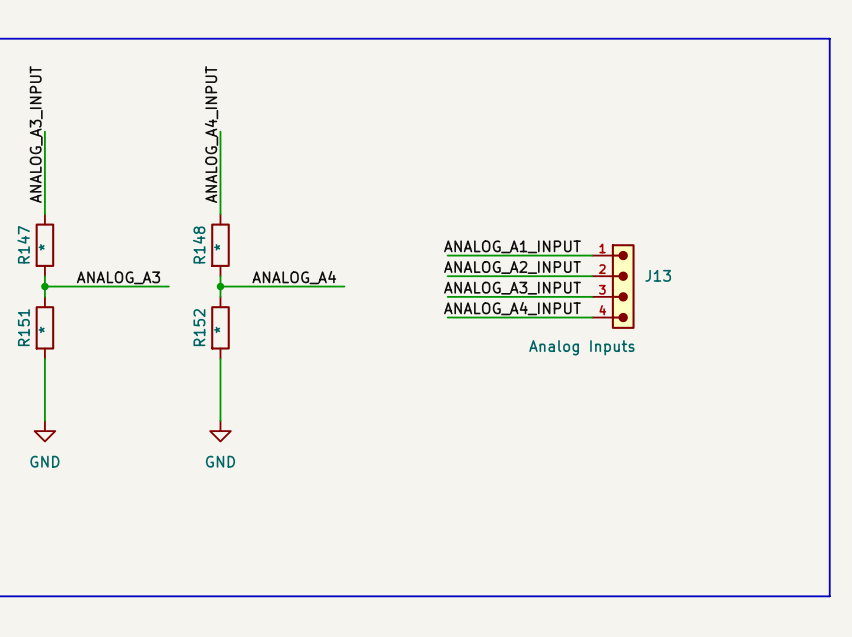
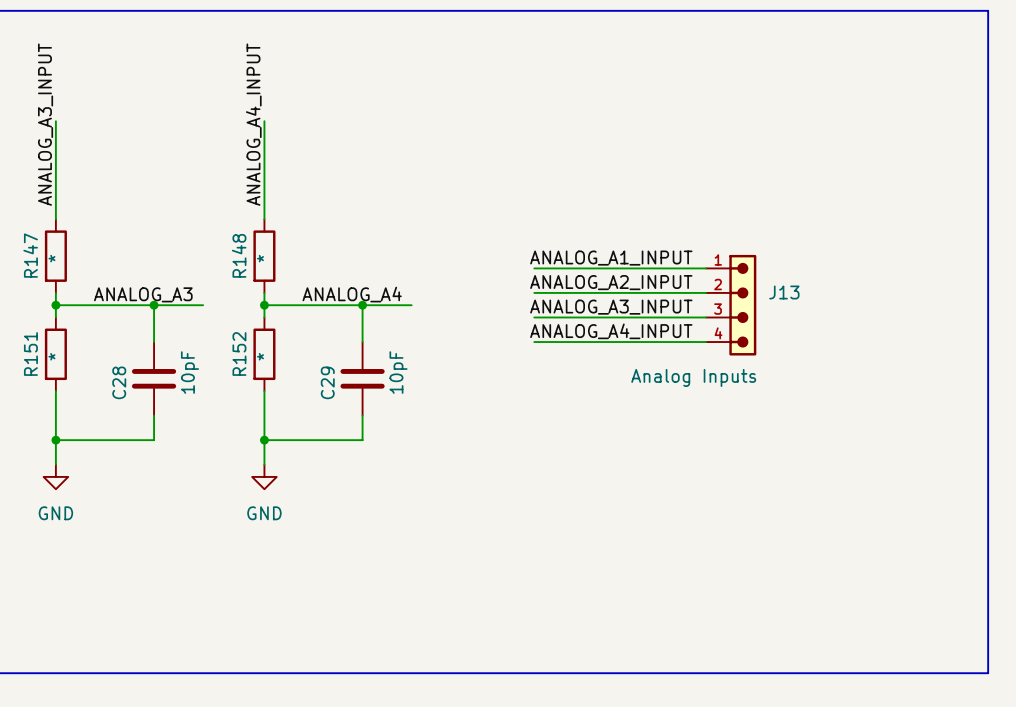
wire: none -> (154, 305) (154, 342)
junction: none -> (154, 305)
wire: none -> (362, 305) (362, 342)
junction: none -> (362, 305)
C28: none -> 10pF (154, 378)
C29: none -> 10pF (362, 378)
wire: none -> (154, 415) (154, 440) (55, 440)
wire: none -> (362, 415) (362, 440) (264, 440)
junction: none -> (55, 440)
junction: none -> (264, 440)

